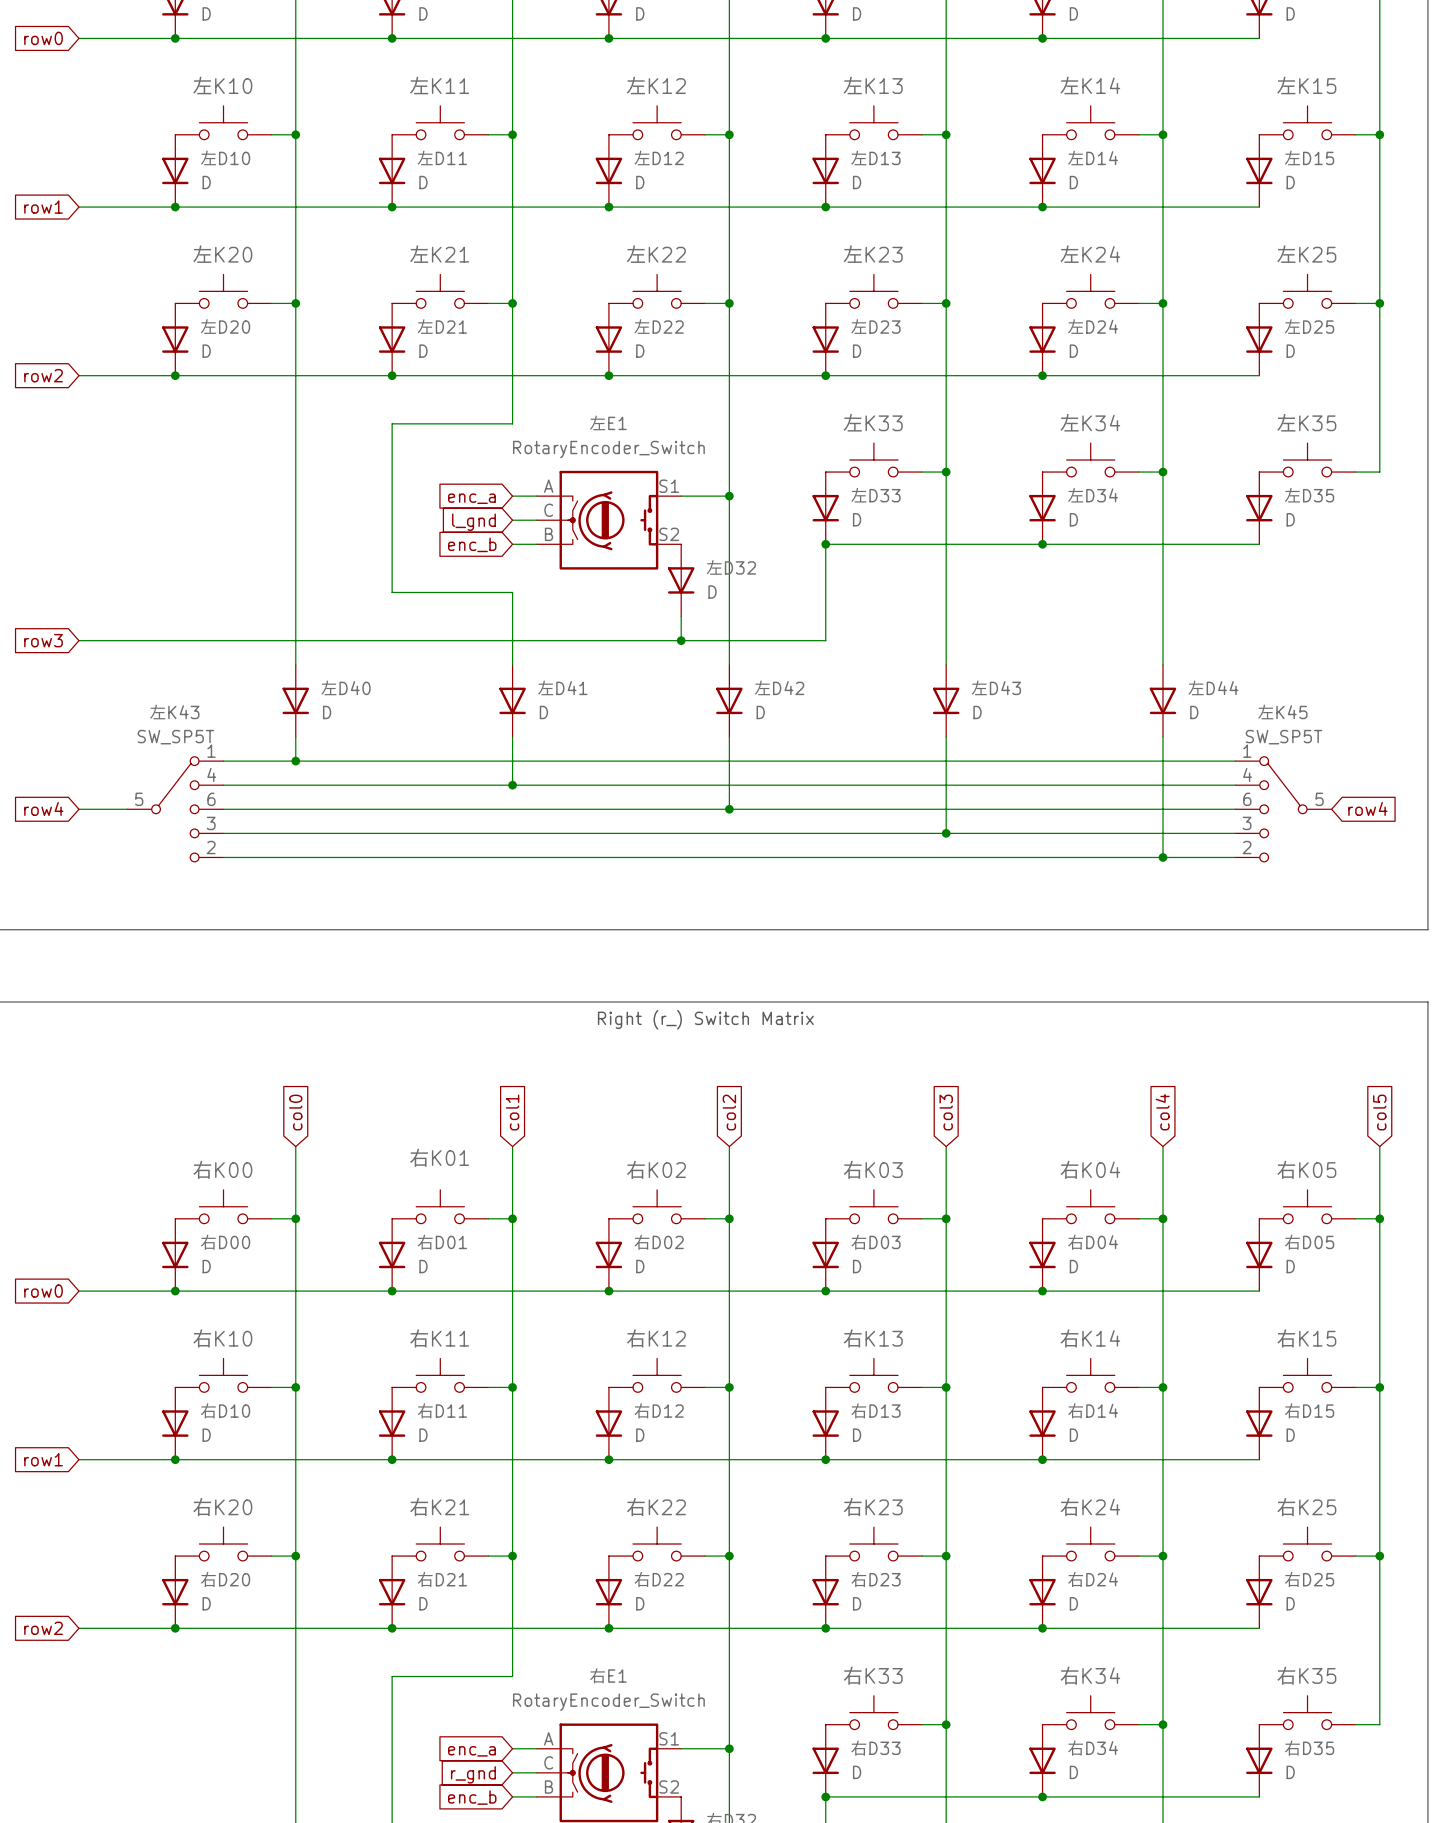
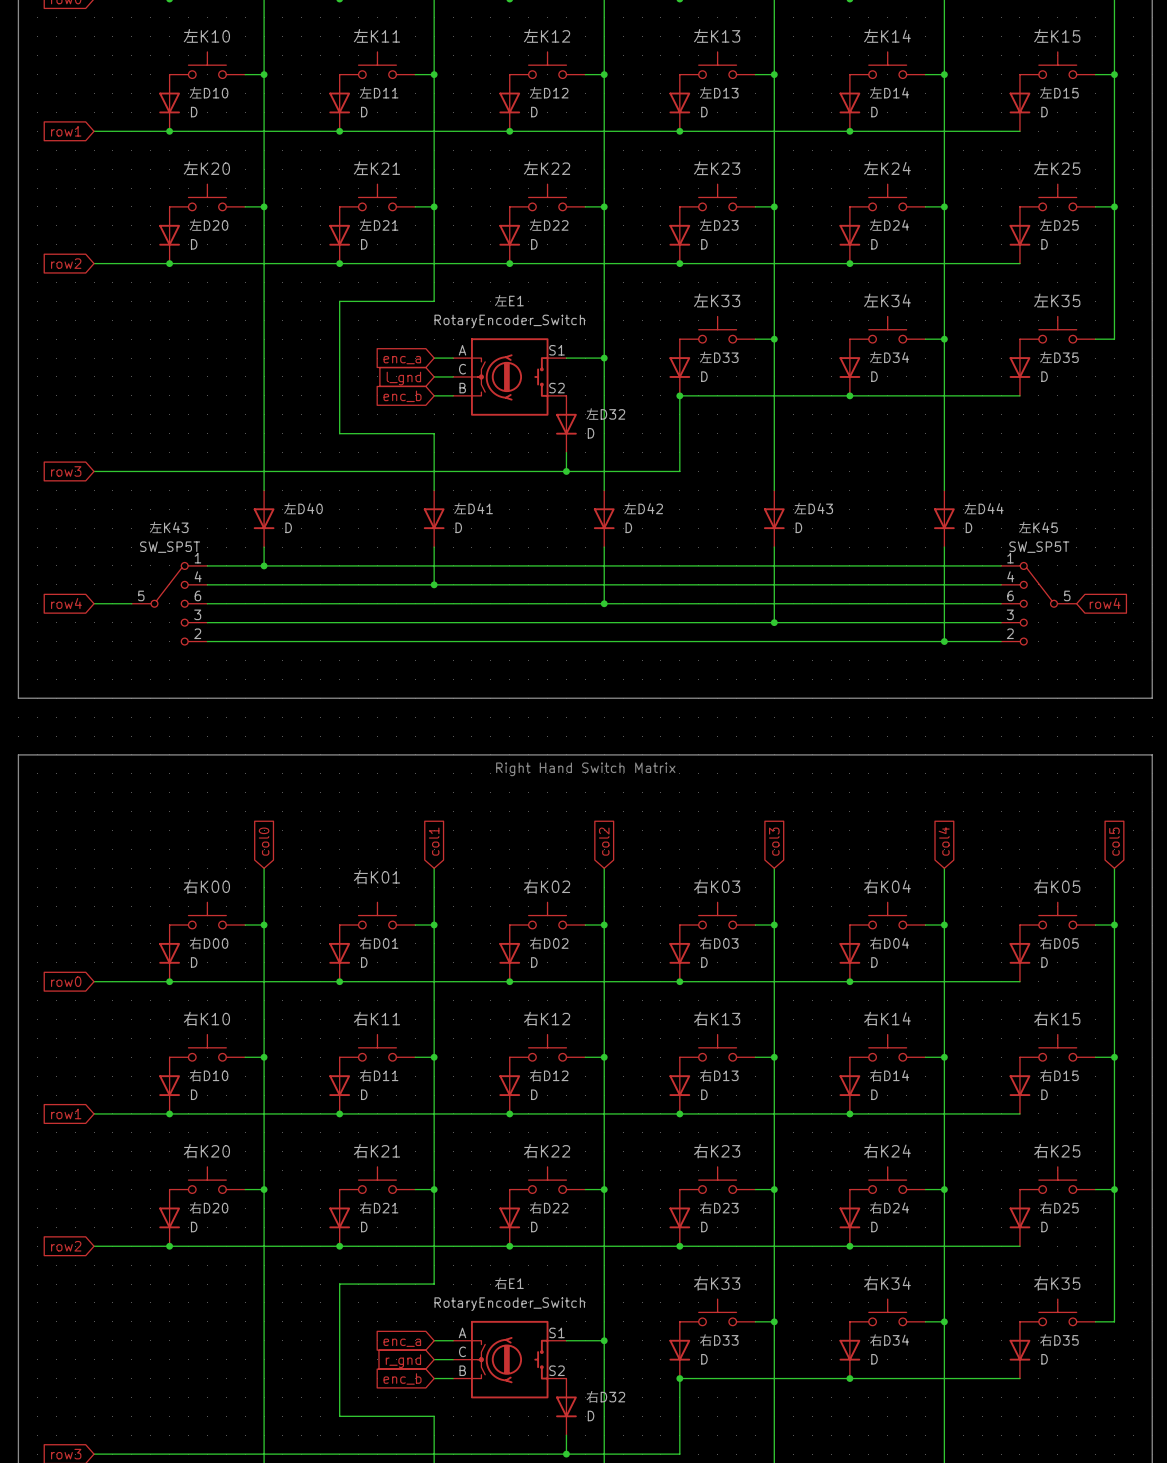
text: Right (r_) Switch Matrix (705, 1019) -> Right Hand Switch Matrix (585, 769)

